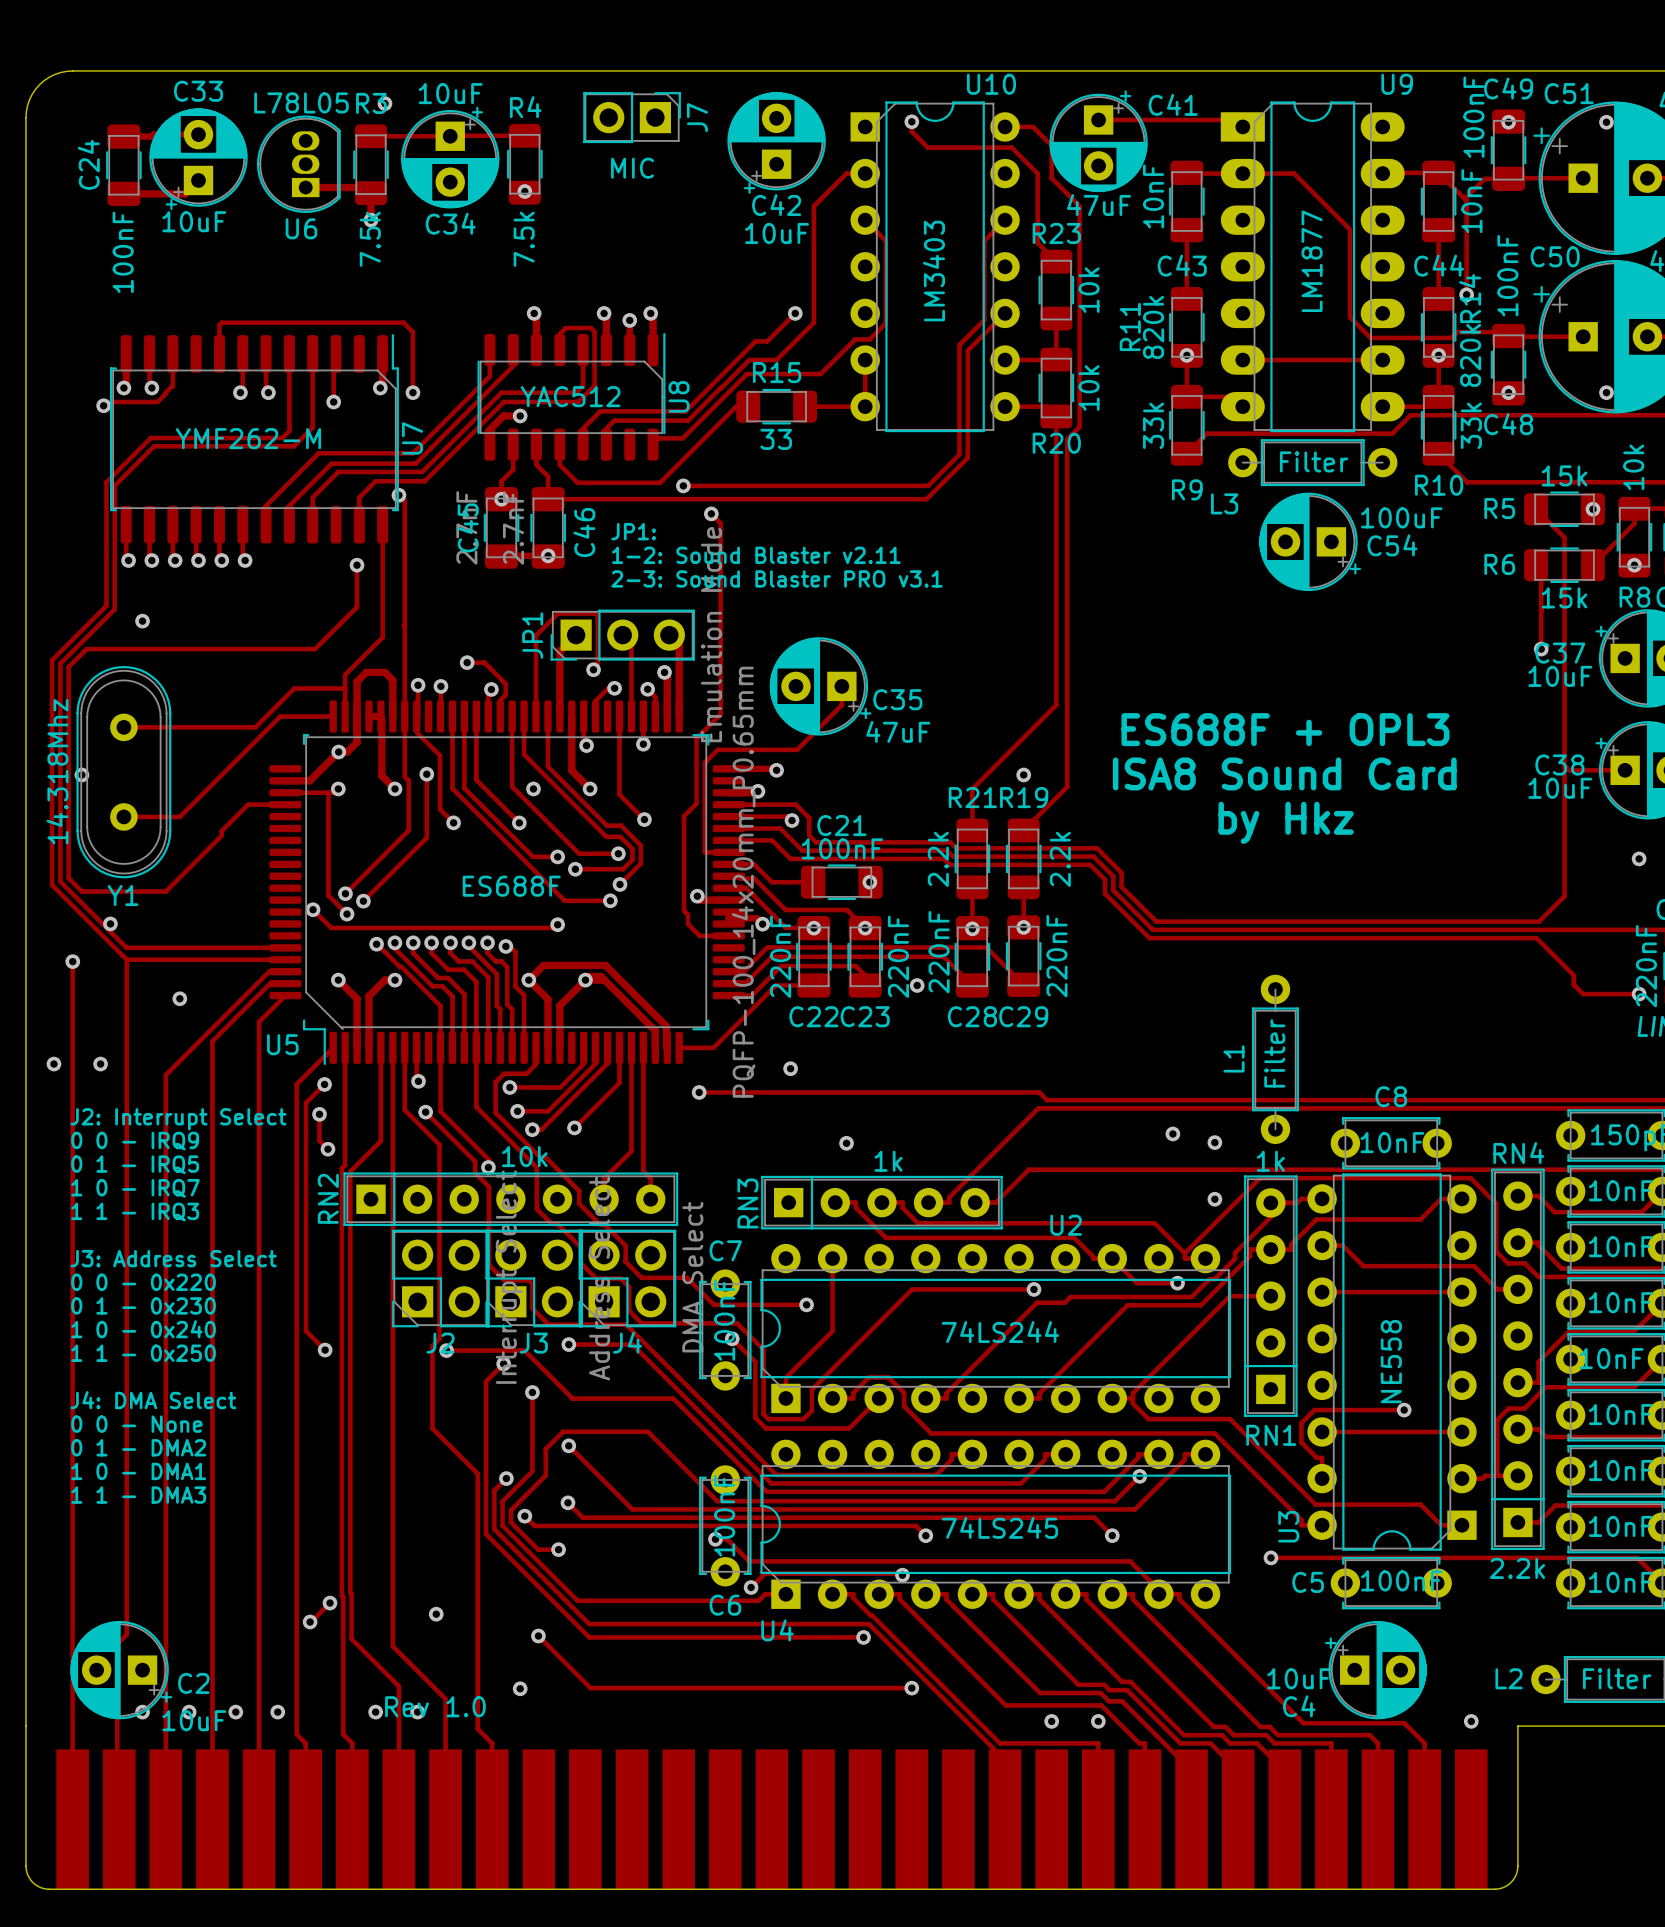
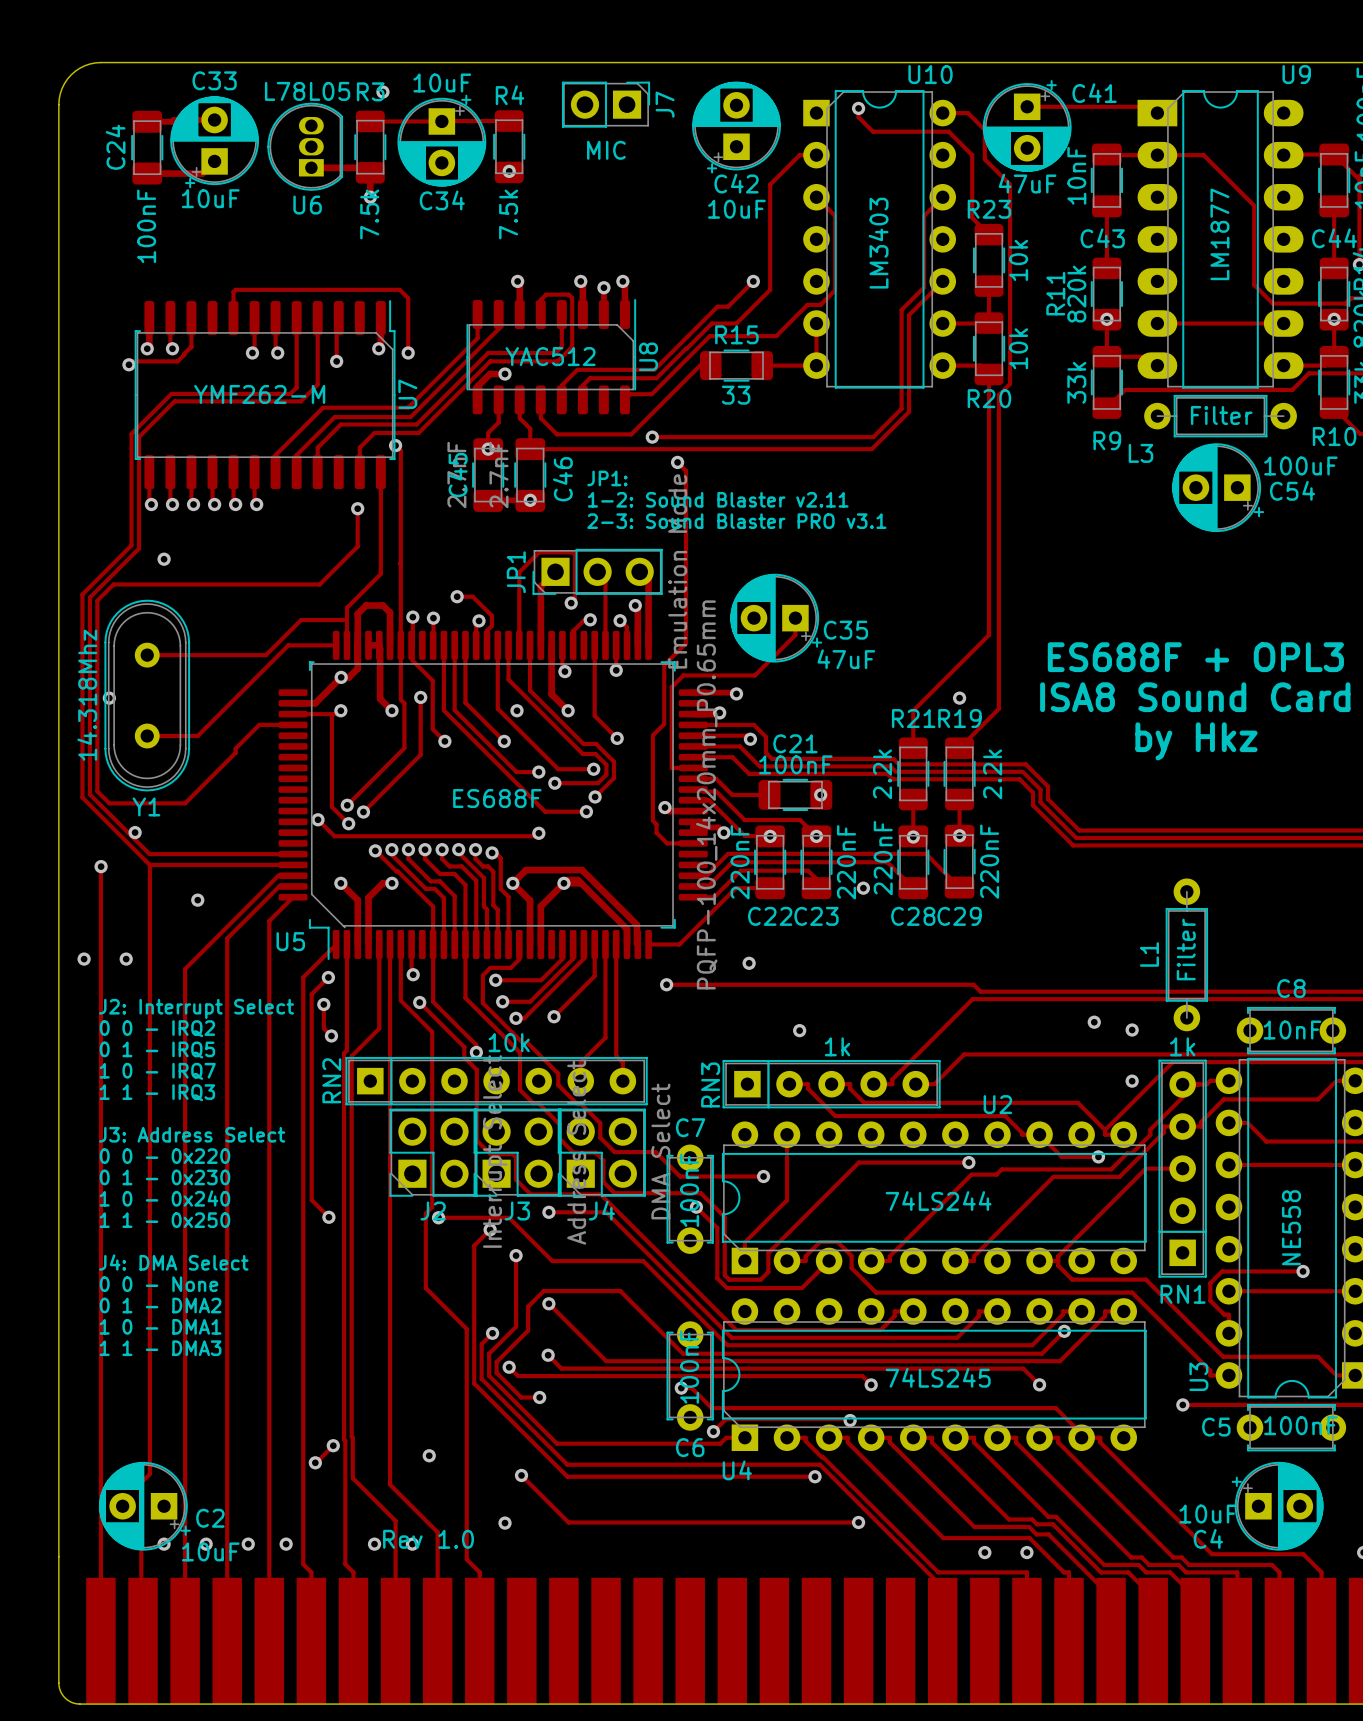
text: 0 0 - IRQ9 (135, 1141) -> 0 0 - IRQ2 (157, 1028)

